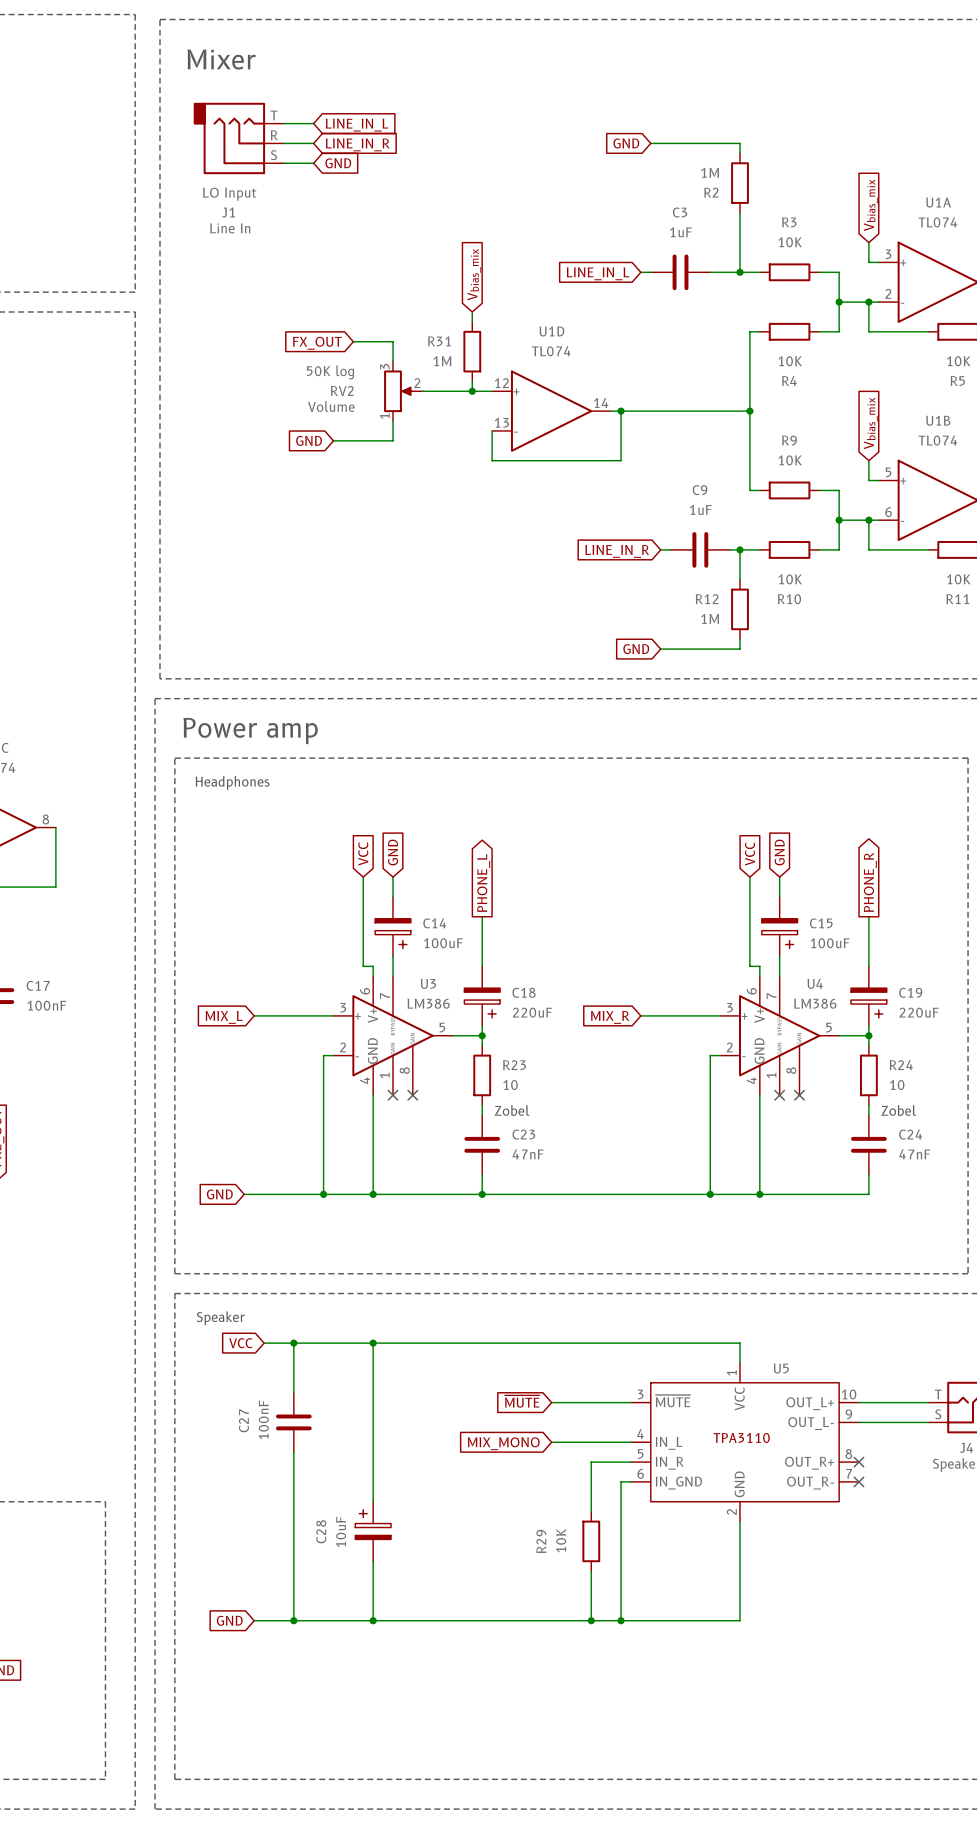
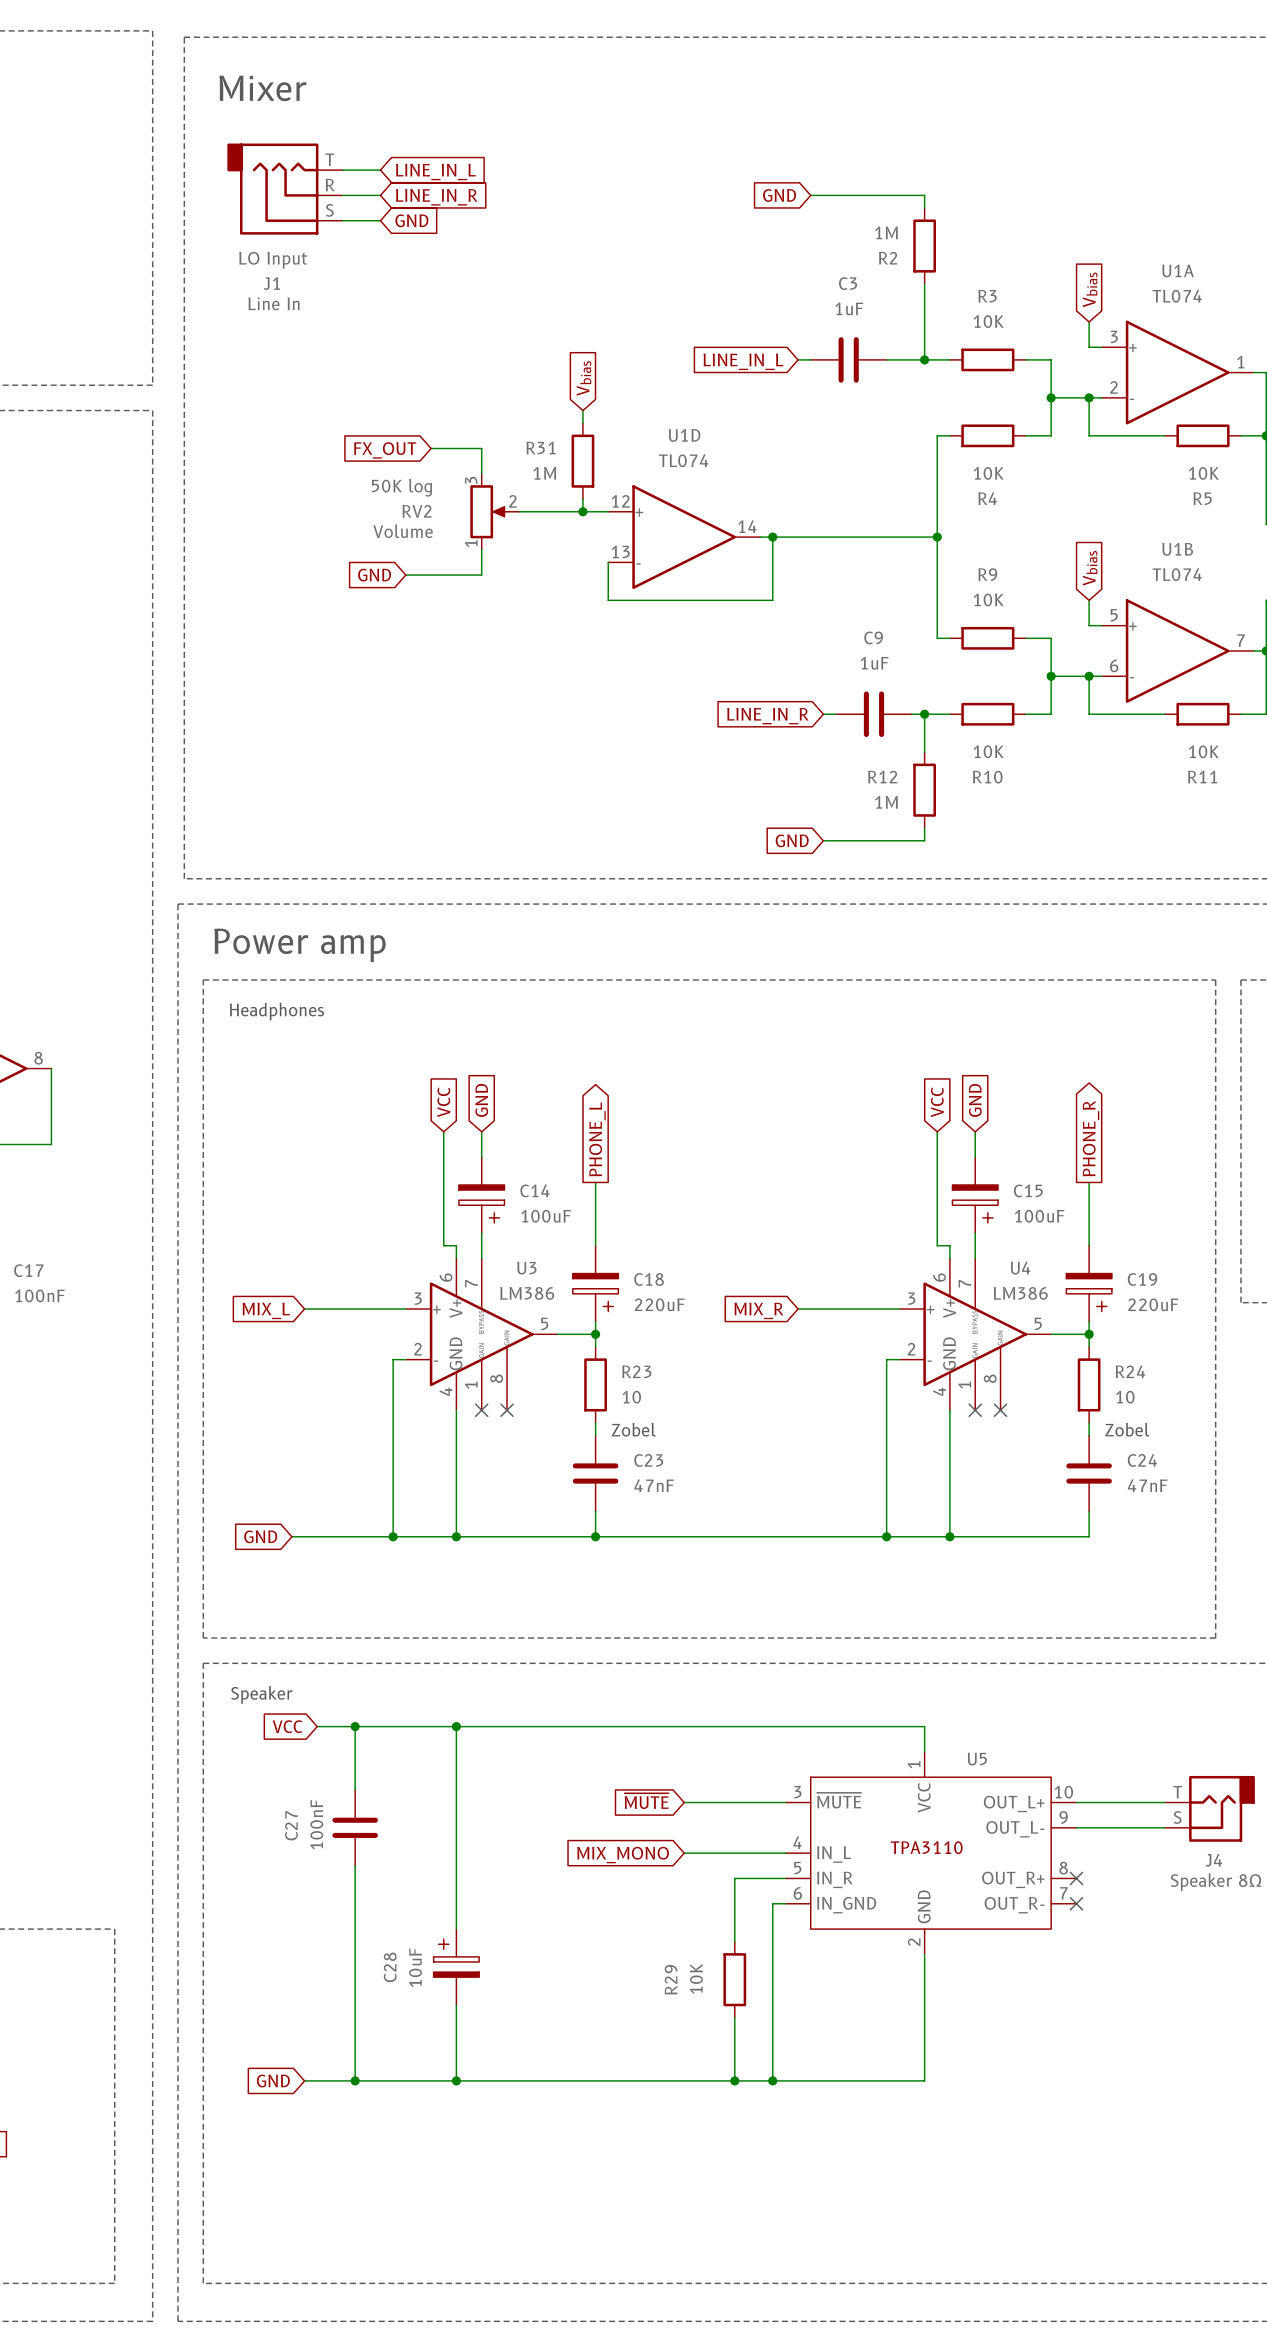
global label: Vbias_mix (870, 205) -> Vbias (1090, 289)
global label: Vbias_mix (474, 274) -> Vbias (583, 378)
global label: Vbias_mix (870, 423) -> Vbias (1090, 568)

